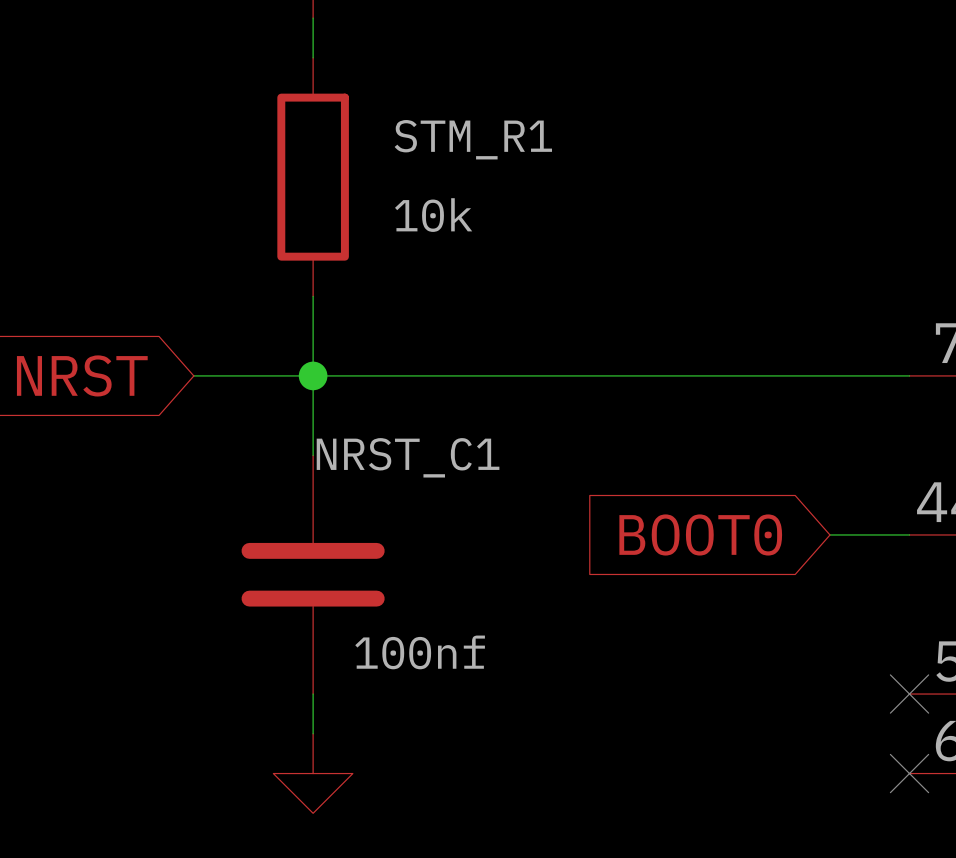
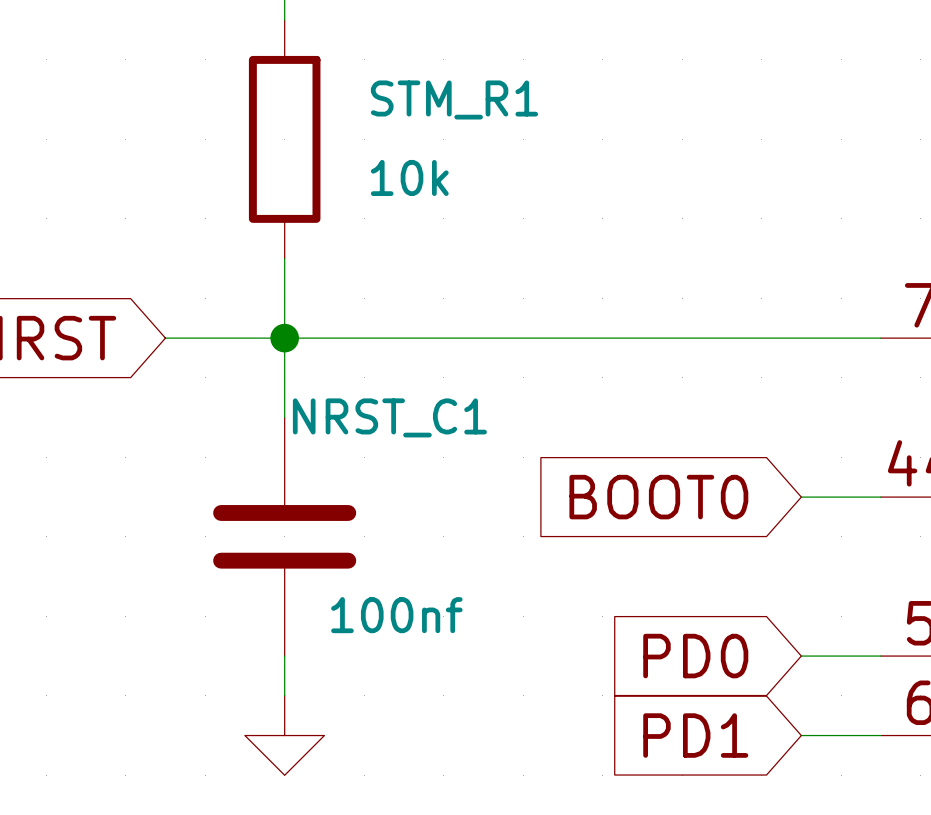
global label: none -> PD0 (695, 656)
wire: none -> (801, 656) (880, 656)
no-connect mark: (909, 694) -> none
global label: none -> PD1 (695, 735)
wire: none -> (801, 735) (880, 735)
no-connect mark: (909, 773) -> none

